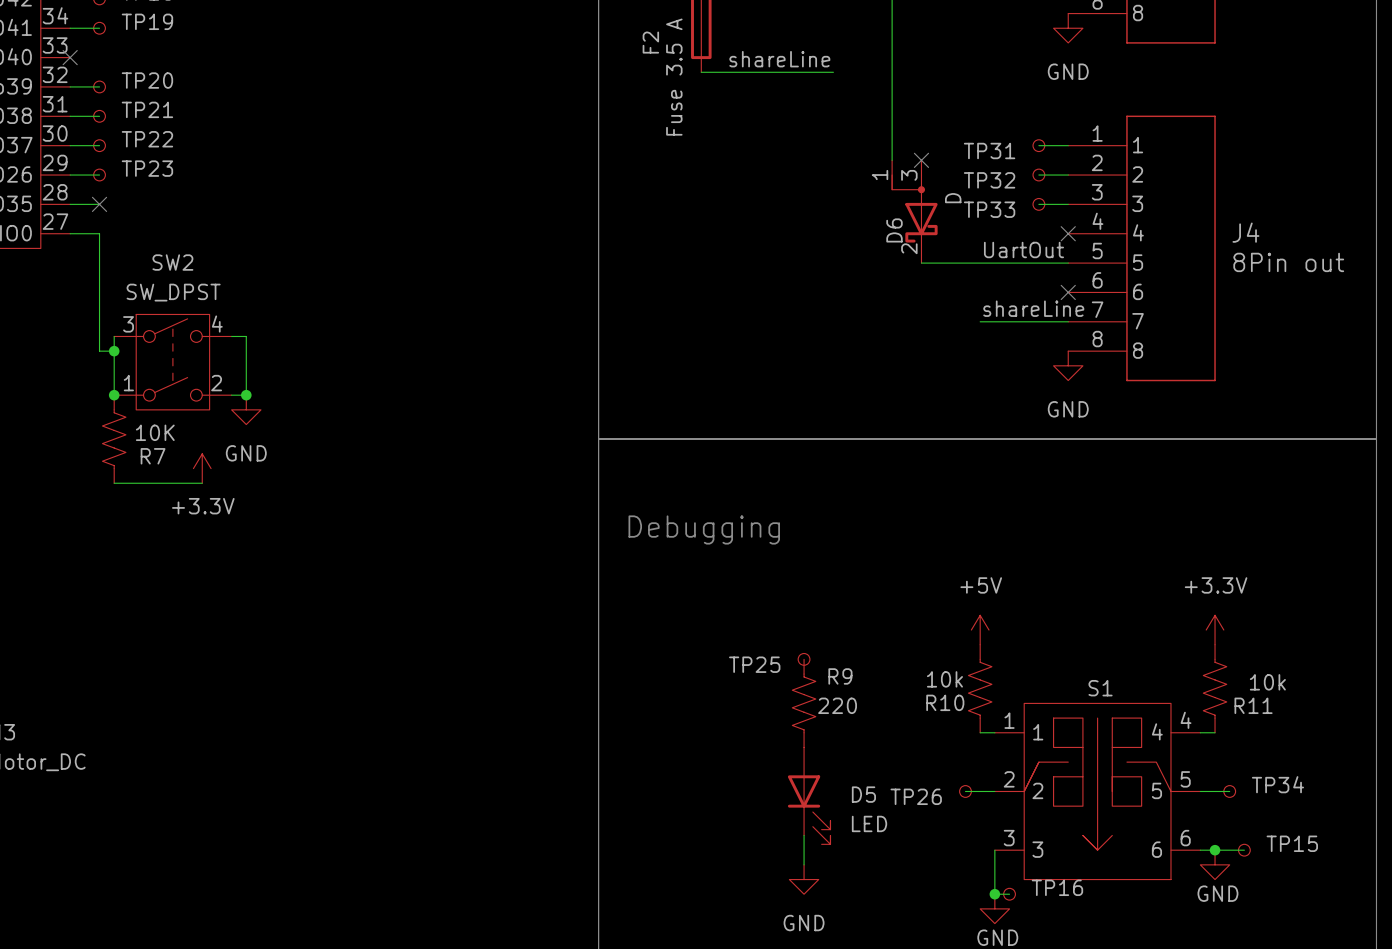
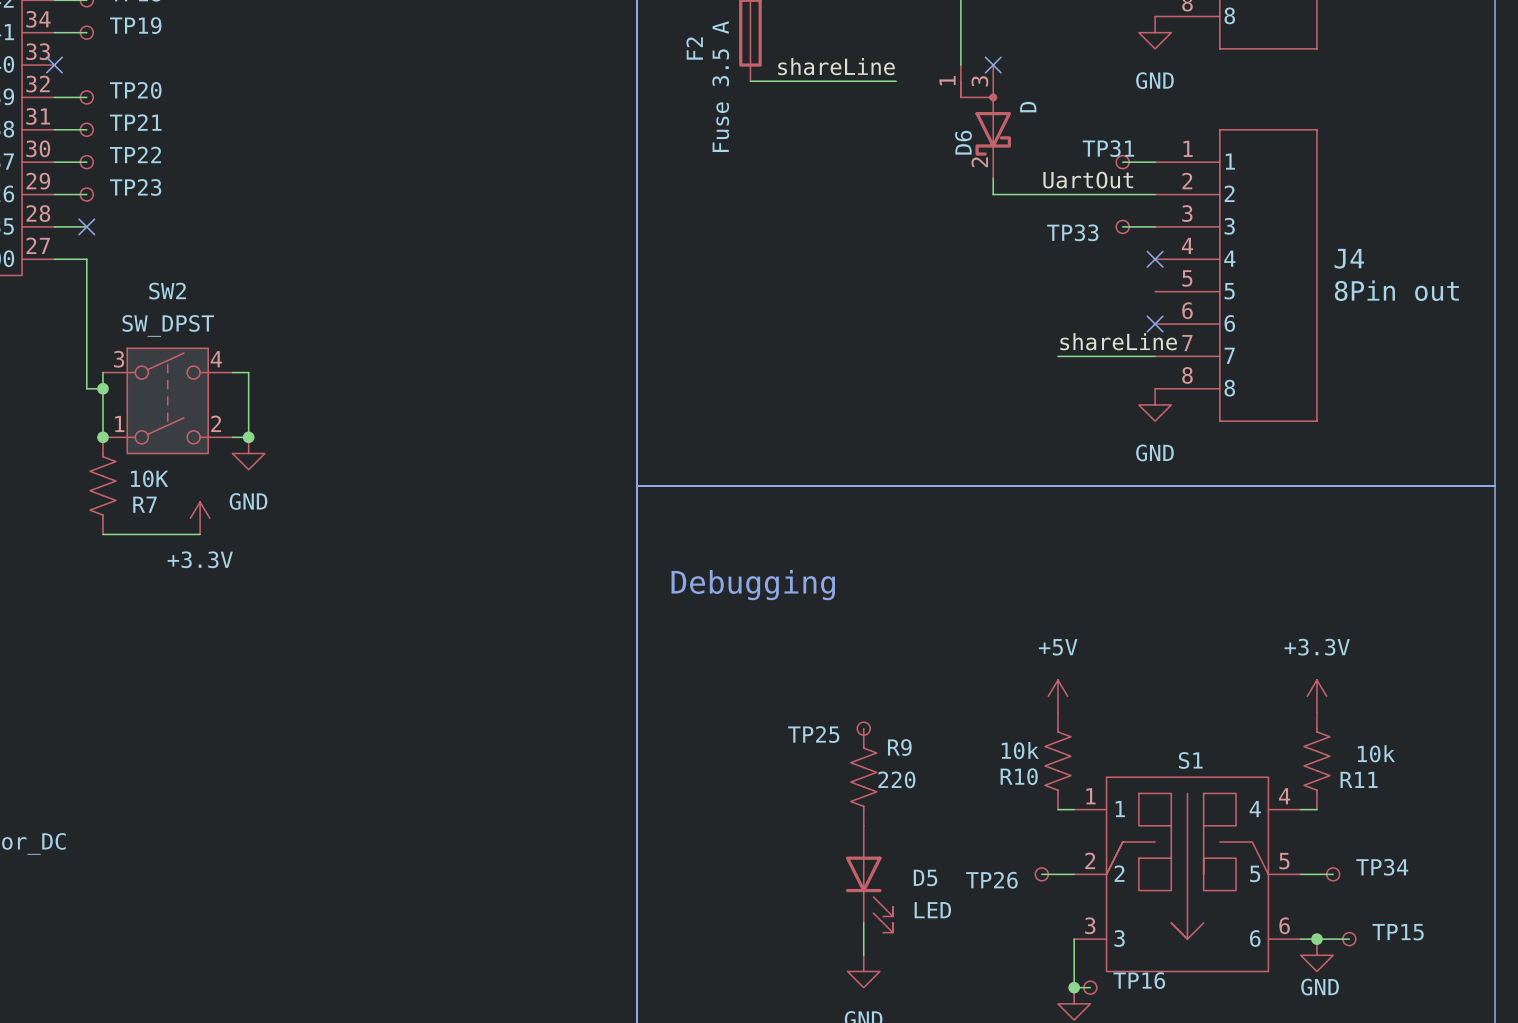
wire: (892, 57) (892, 160) -> none
no-connect mark: none -> (993, 65)
TP31 name position: TP31 (989, 150) -> TP31 (1108, 148)
wire: none -> (993, 178) (993, 194) (1122, 194)
no-connect mark: (921, 160) -> none
TP32: (1038, 175) -> none
D6 position: (914, 211) -> (985, 121)
label position: UartOut (1023, 249) -> UartOut (1088, 180)
wire: (921, 263) (1068, 263) -> none

